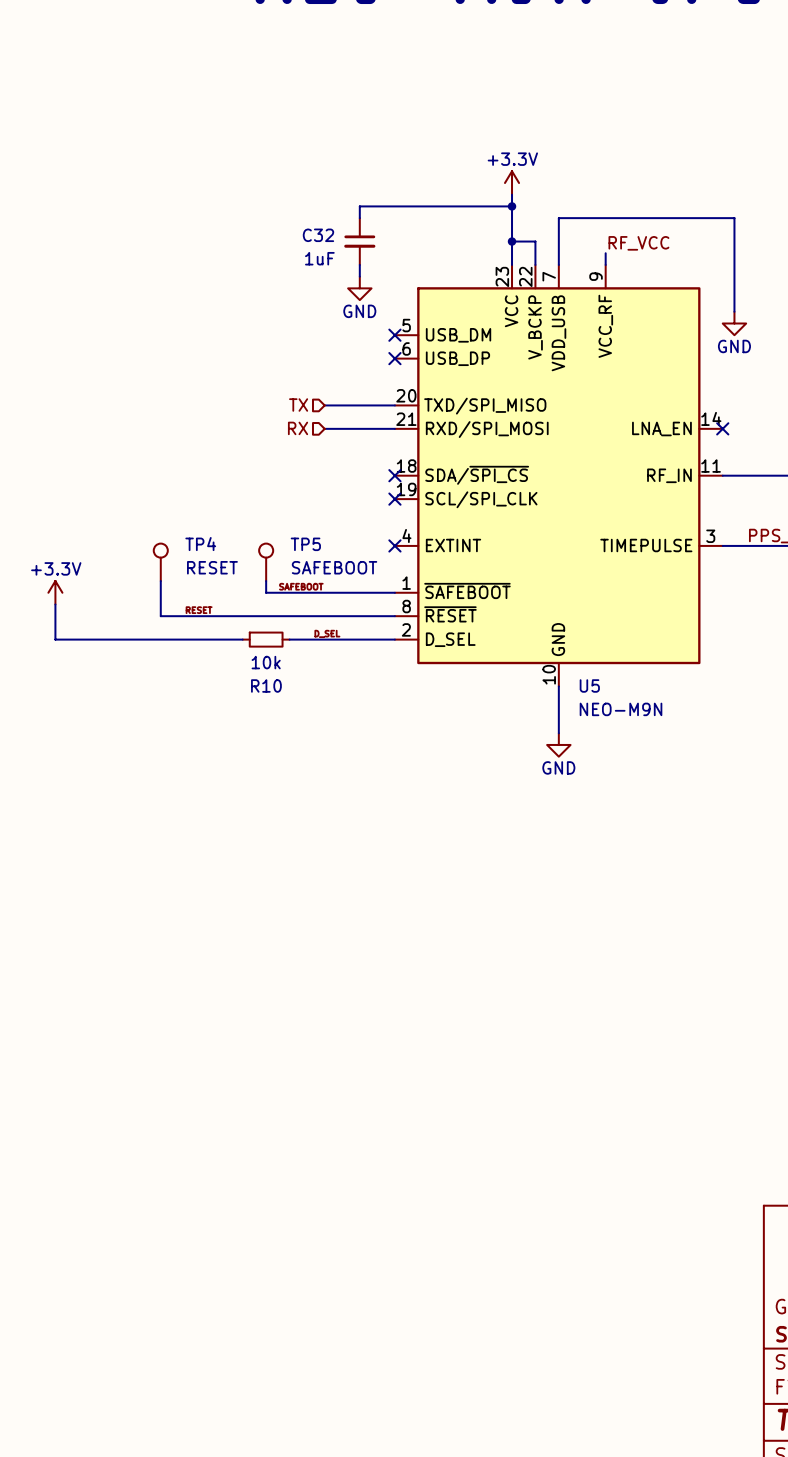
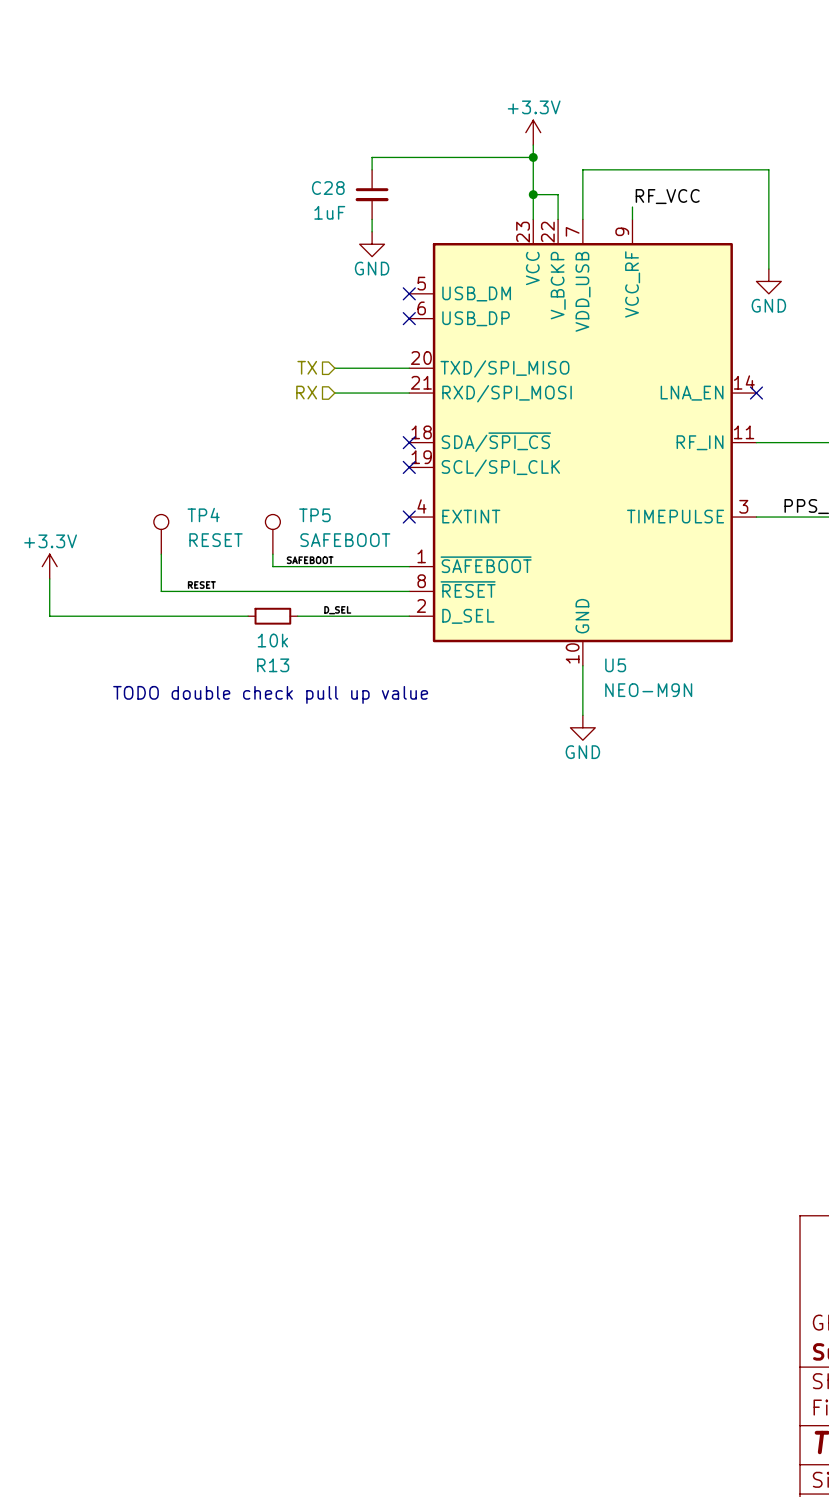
C32 name: C32 (318, 235) -> C28 (328, 188)
R10 name: R10 (266, 685) -> R13 (273, 665)
text: none -> TODO double check pull up value (270, 694)

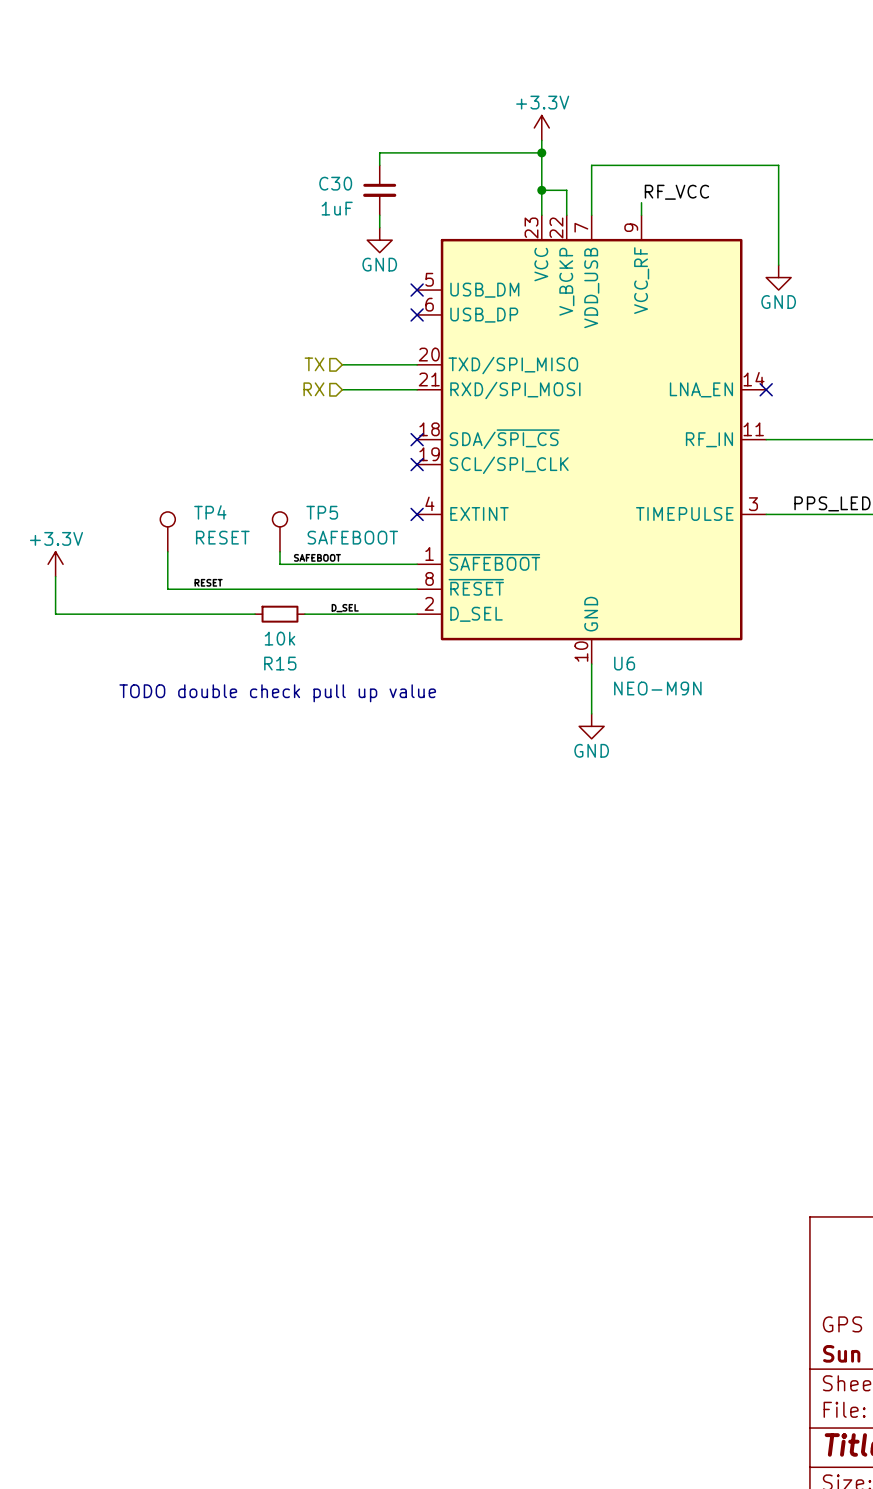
C28 name: C28 (328, 188) -> C30 (335, 183)
R13 name: R13 (273, 665) -> R15 (280, 663)
U5 name: U5 (615, 665) -> U6 (624, 663)

